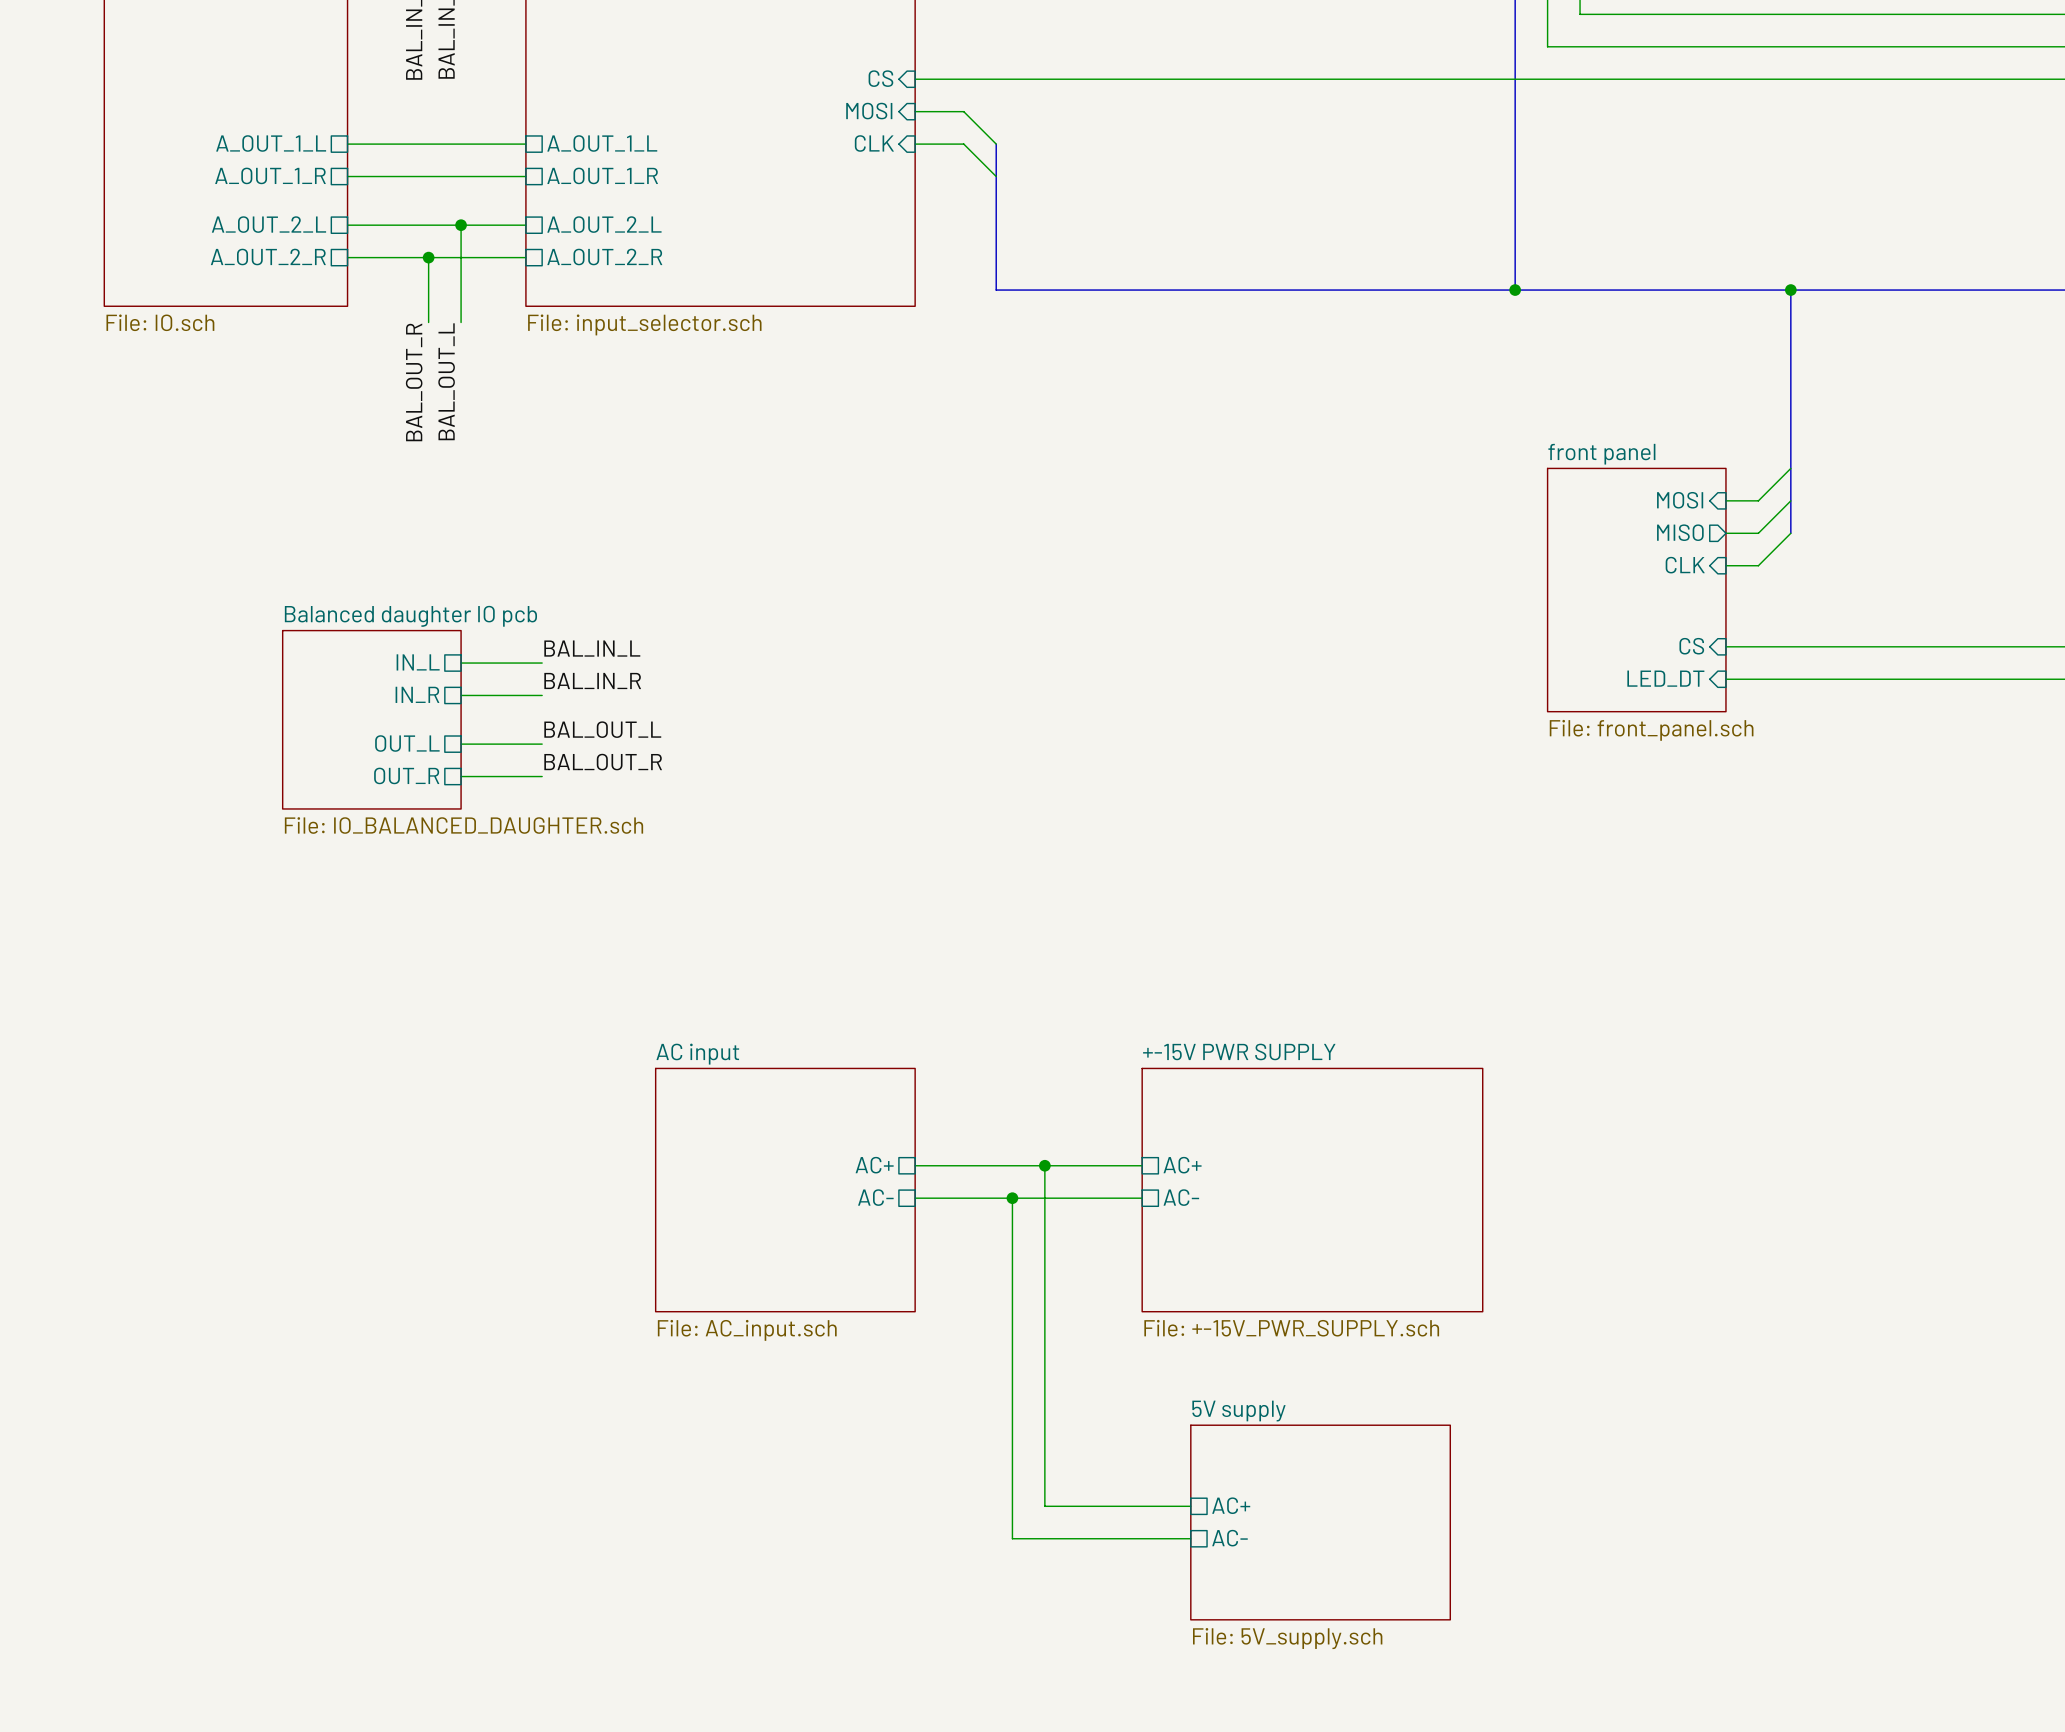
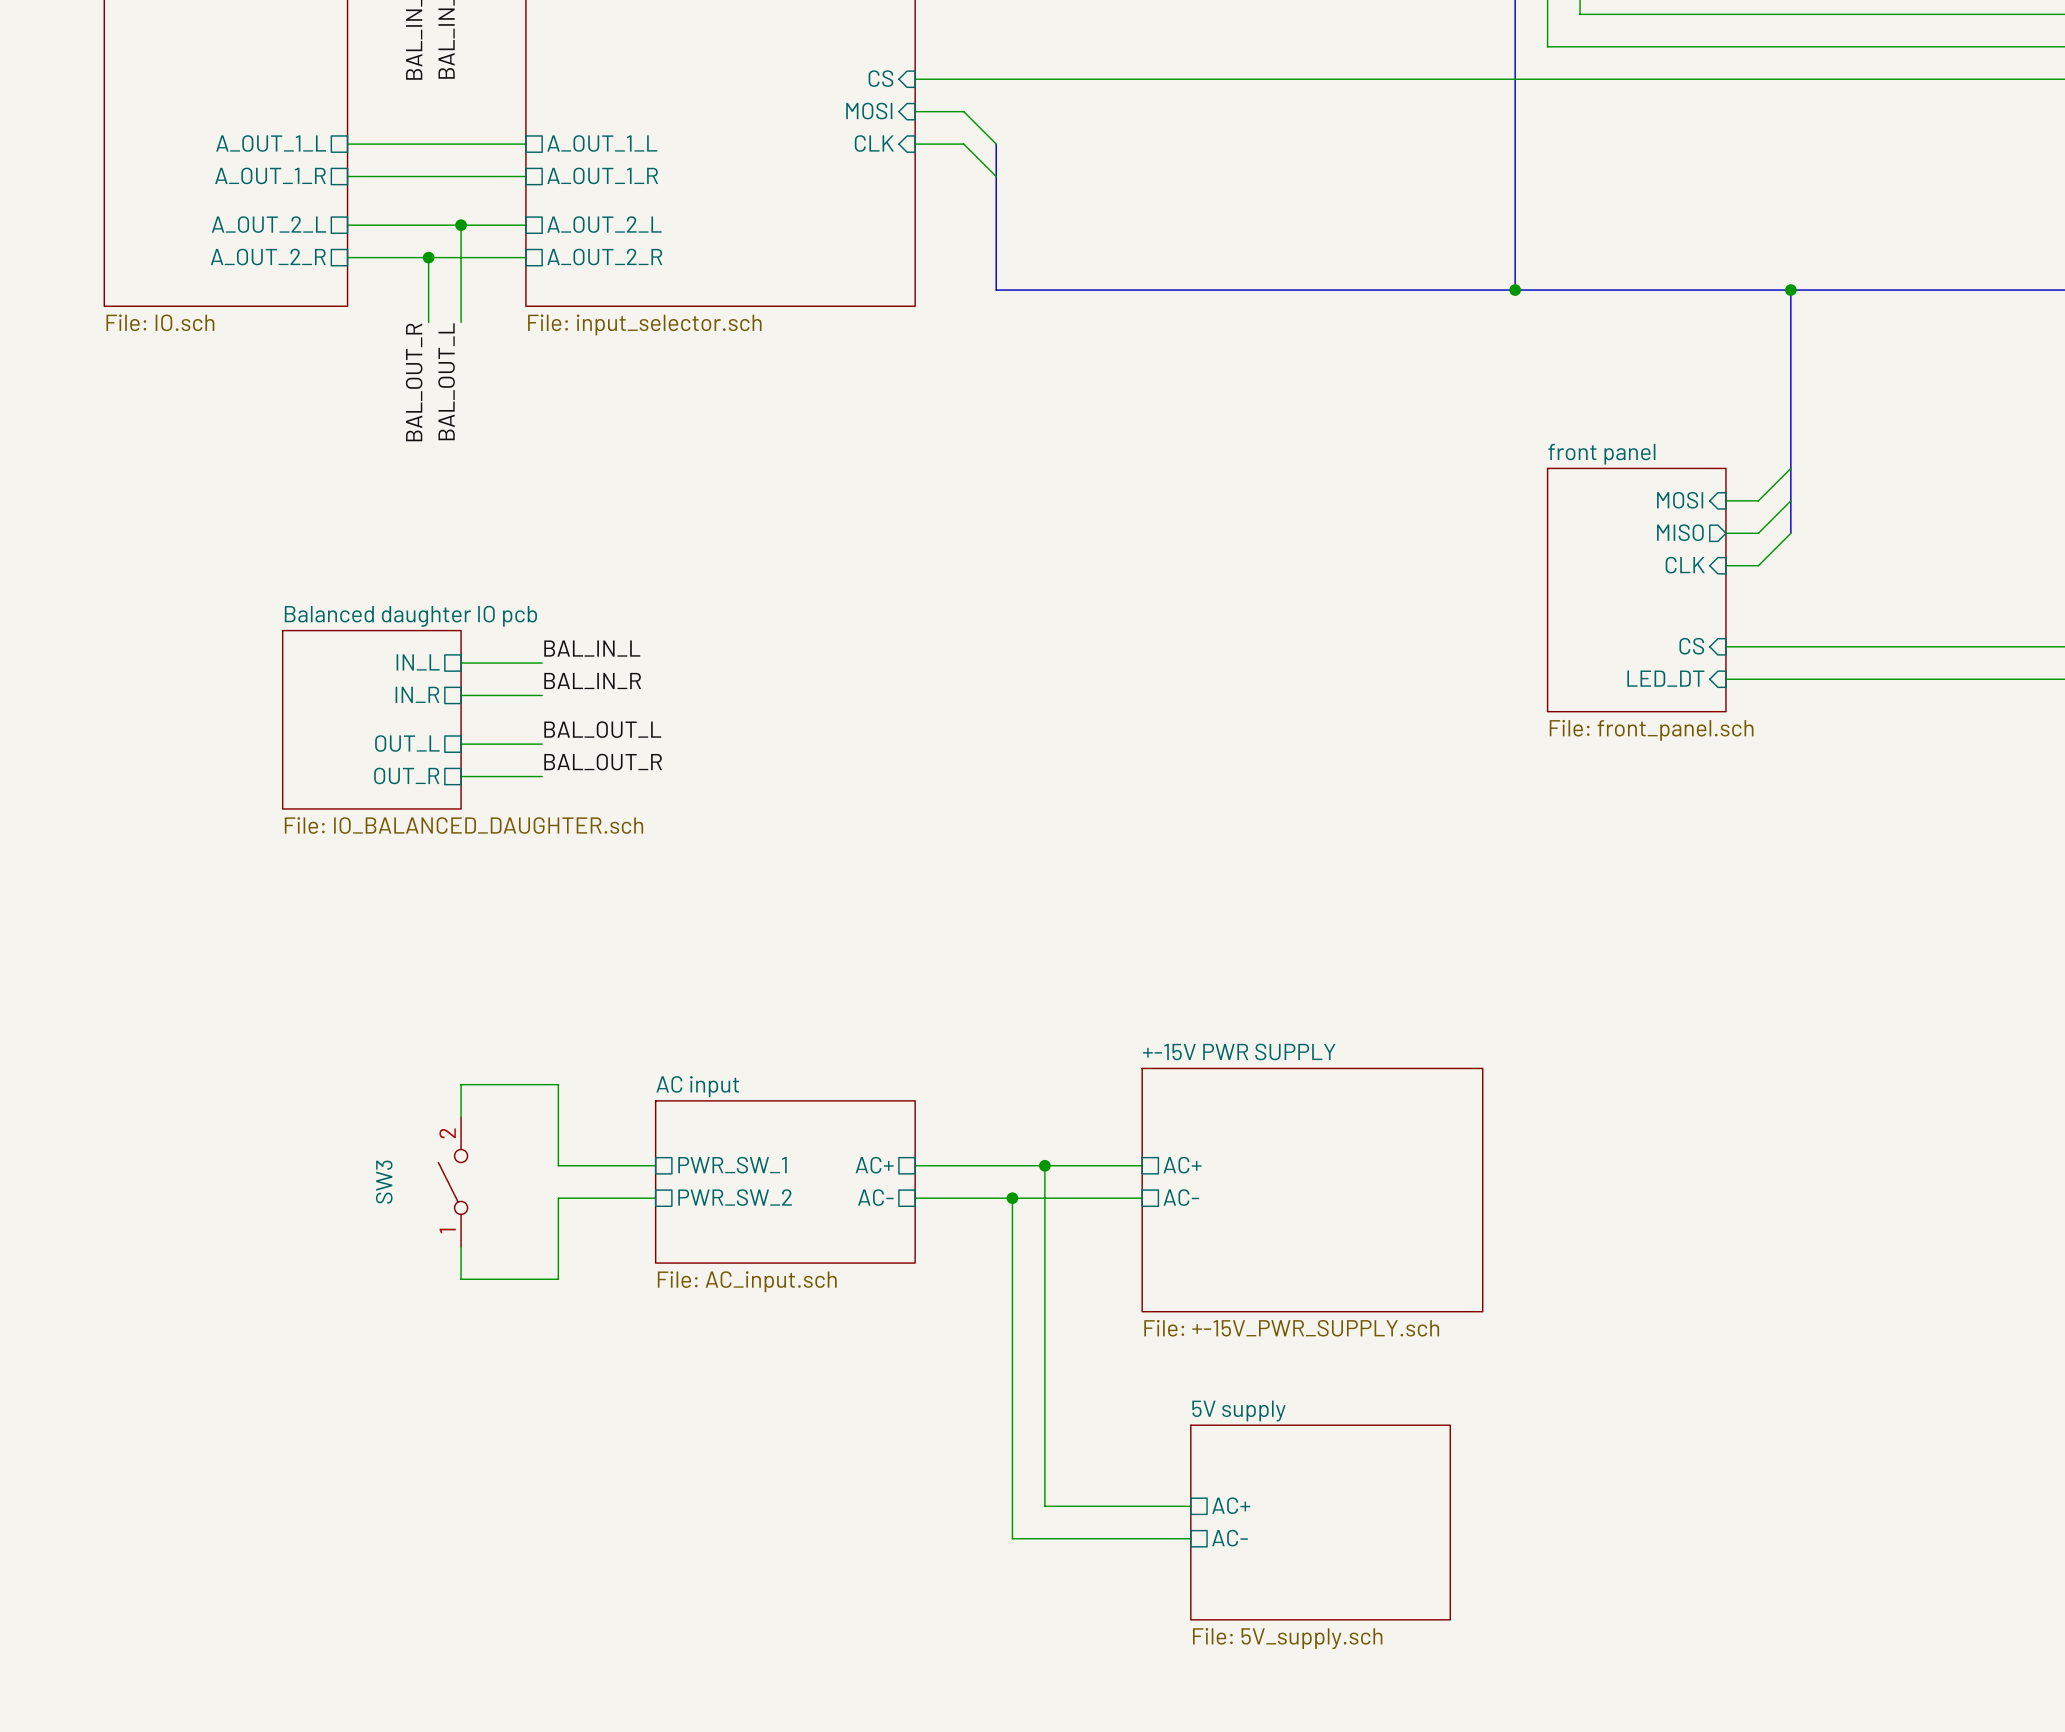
sheet AC input name position: AC input (697, 1054) -> AC input (697, 1086)
sheet AC input shape: [655, 1068, 916, 1312] -> [655, 1100, 916, 1264]
wire: none -> (461, 1117) (461, 1084) (558, 1084) (558, 1165) (655, 1165)
sheet pin: none -> PWR_SW_1 (732, 1165)
SW3: none -> (452, 1181)
sheet pin: none -> PWR_SW_2 (735, 1197)
wire: none -> (655, 1198) (558, 1198) (558, 1279) (461, 1279) (461, 1246)
sheet AC input value position: File: AC_input.sch (747, 1330) -> File: AC_input.sch (747, 1281)

